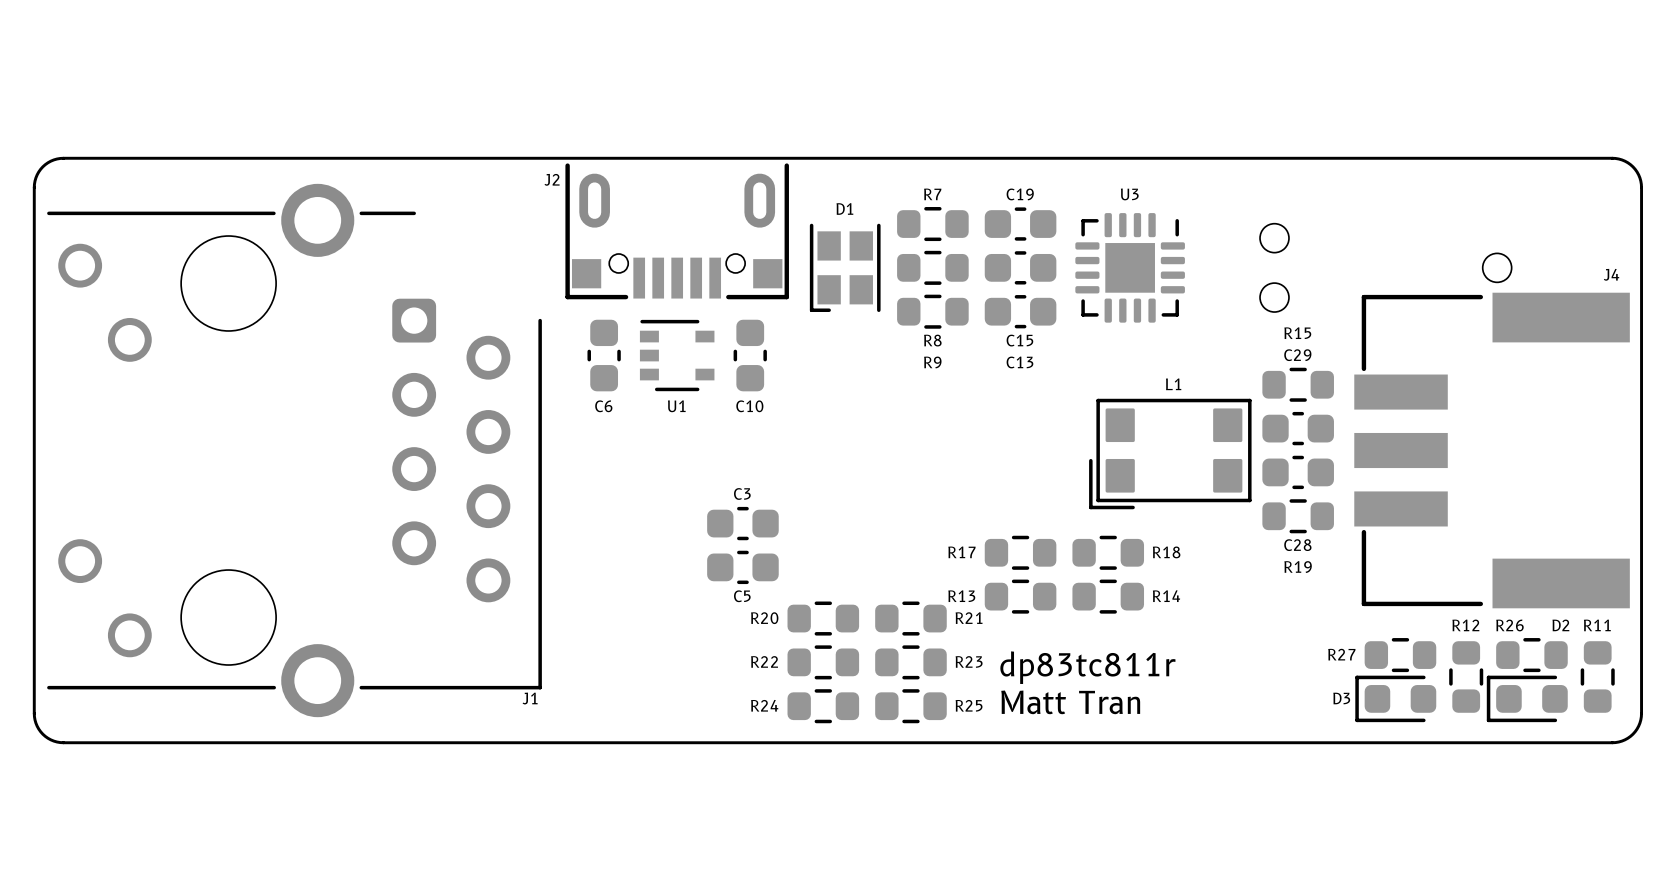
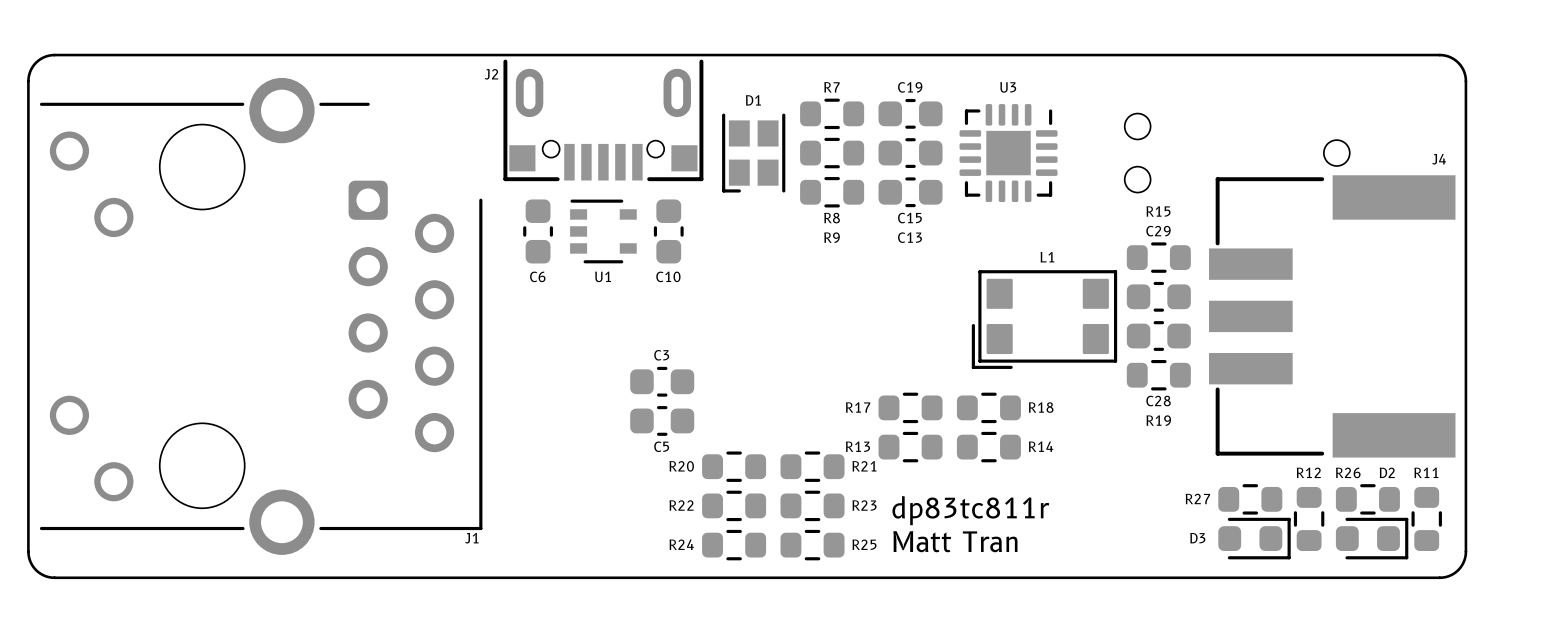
D3 rotation: 0° (1395, 698) -> 180° (1254, 538)
D2 rotation: 0° (1527, 698) -> 180° (1372, 538)

